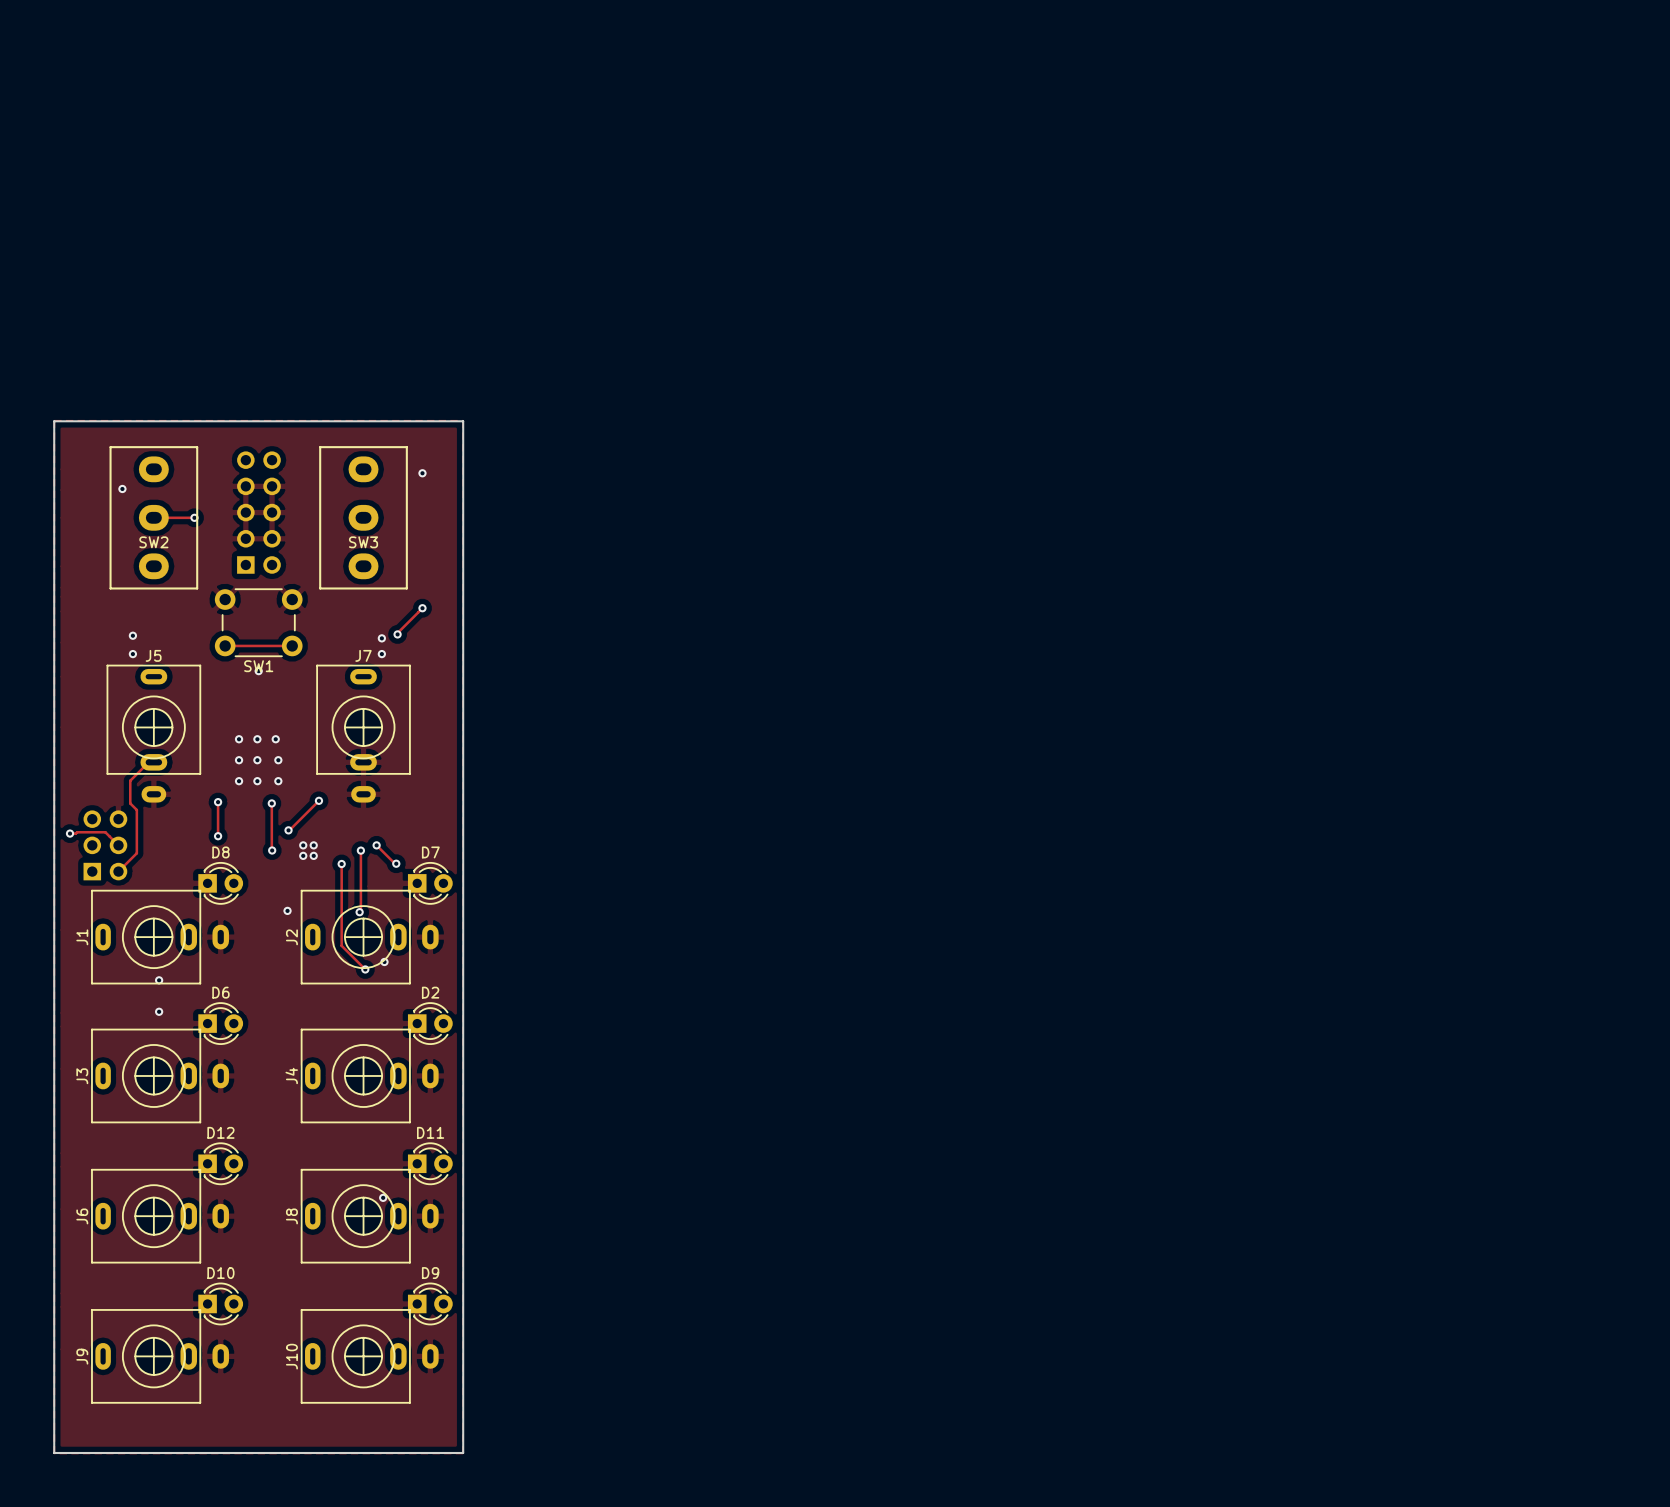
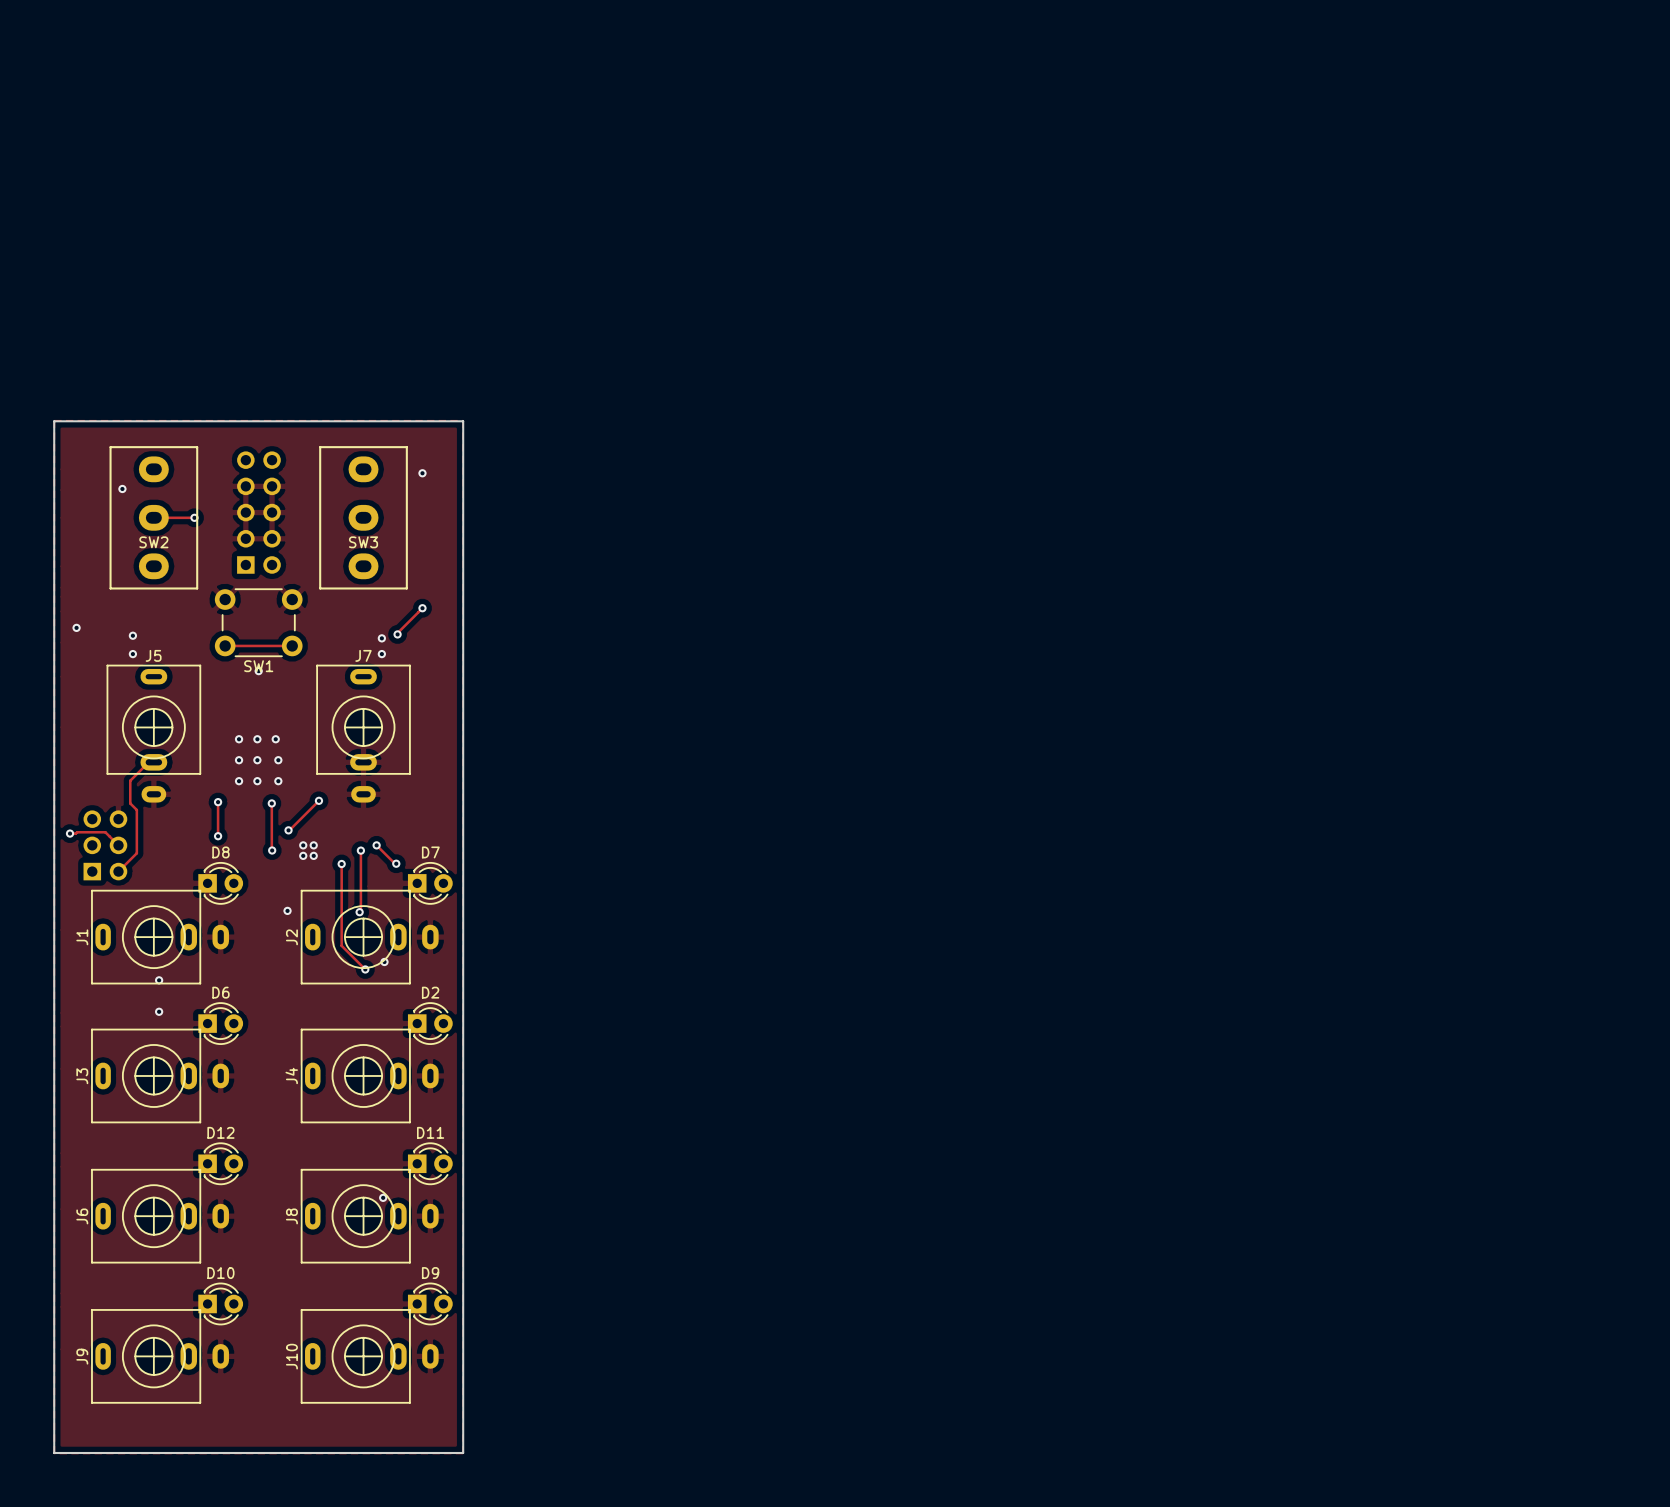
via: none -> (76, 627)

